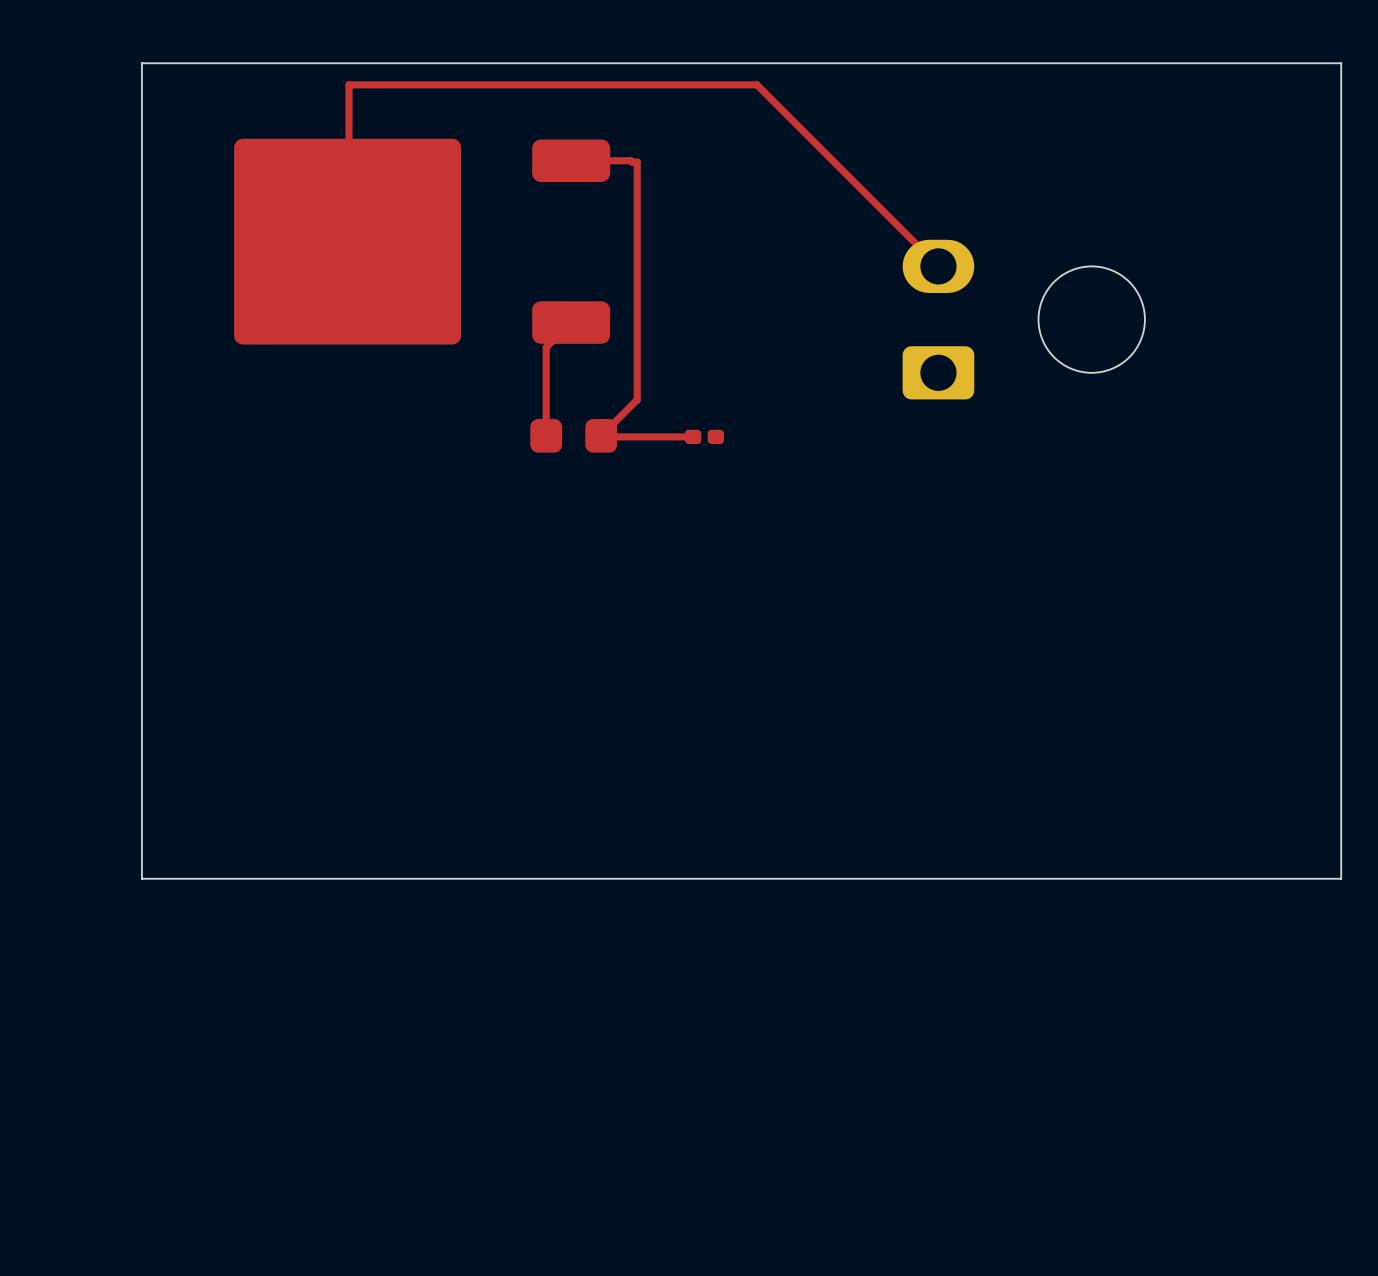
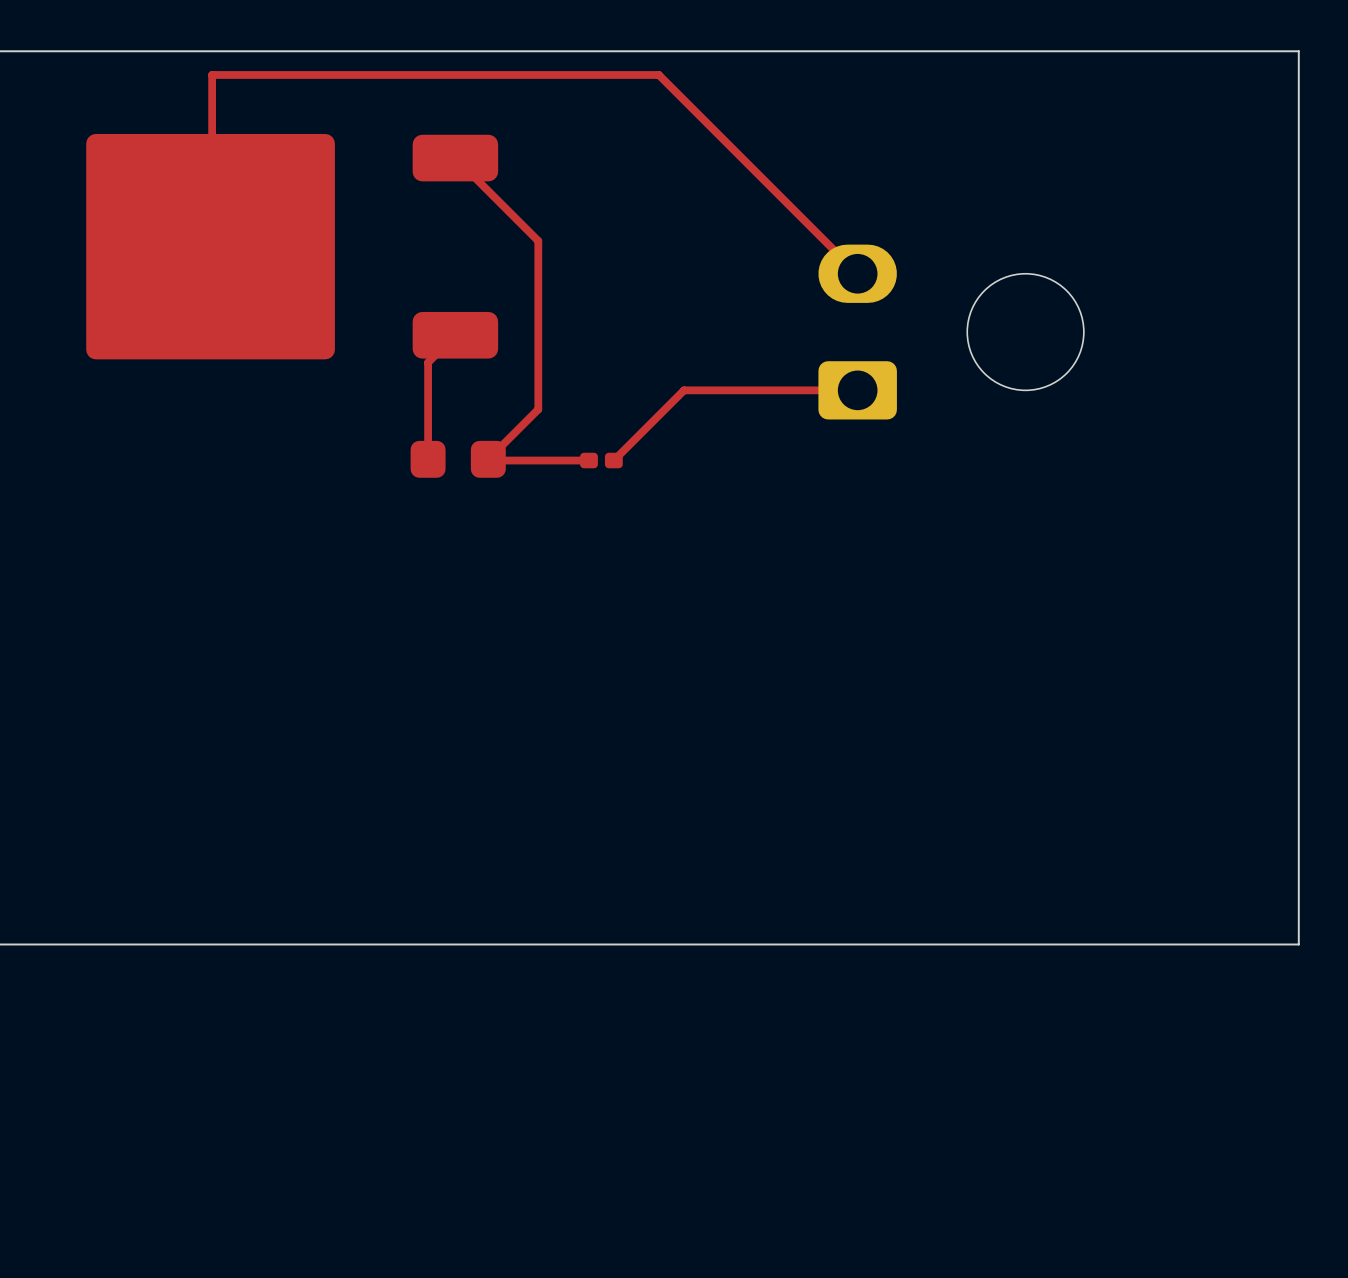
top track: (571, 160) (637, 162) (637, 399) -> (455, 158) (538, 240) (538, 409) (527, 419)
top track: none -> (857, 390) (684, 390) (613, 460)

